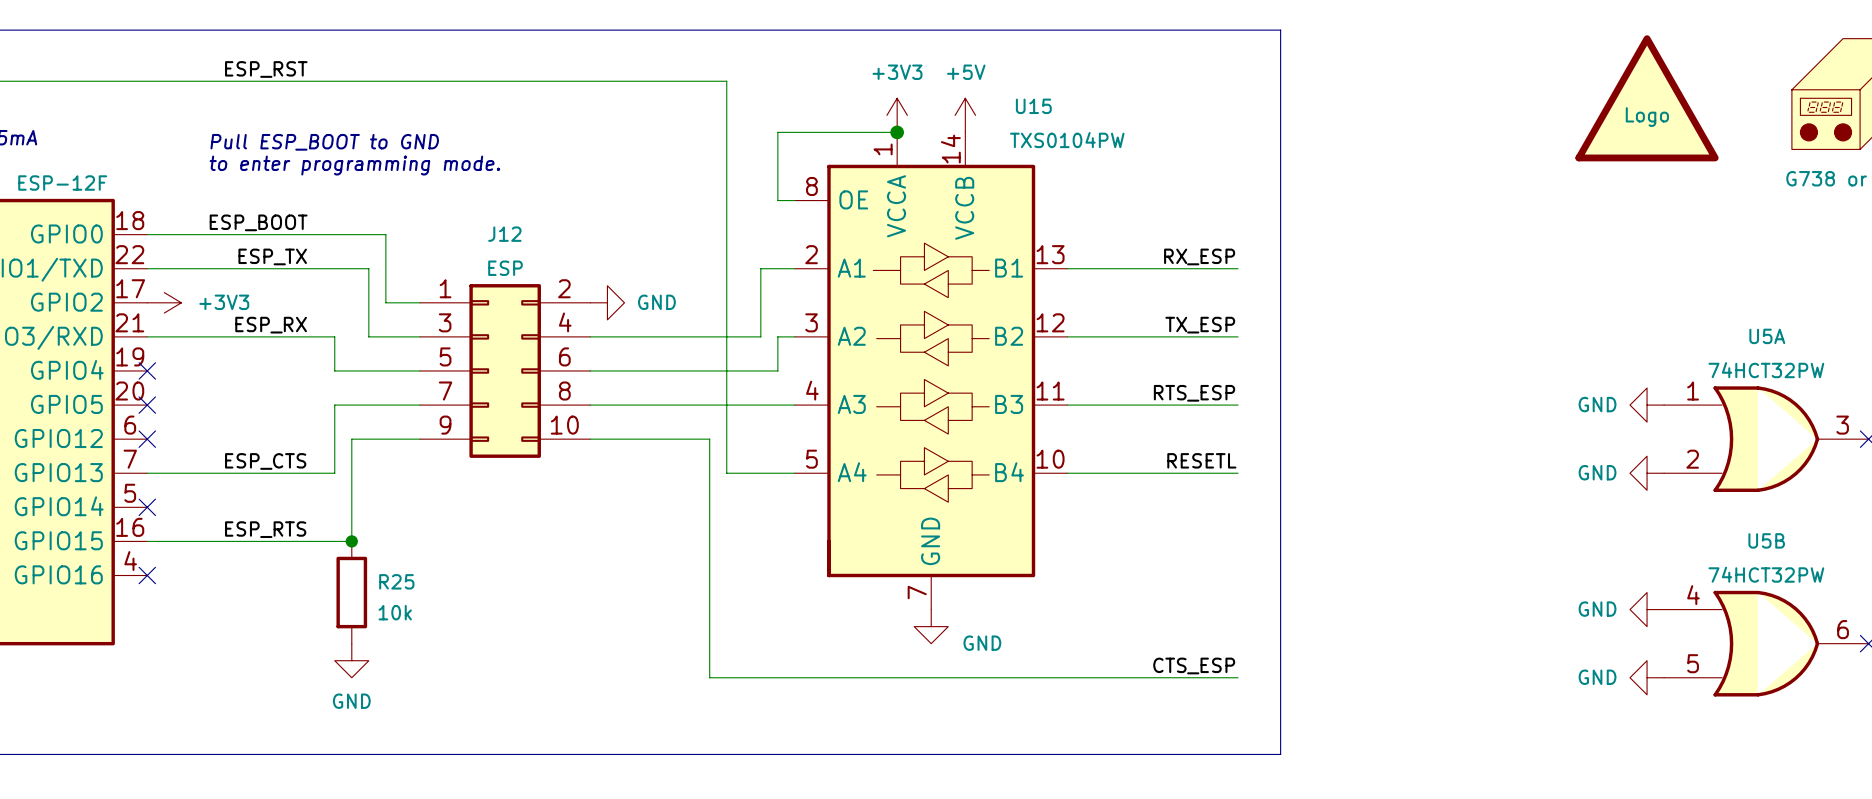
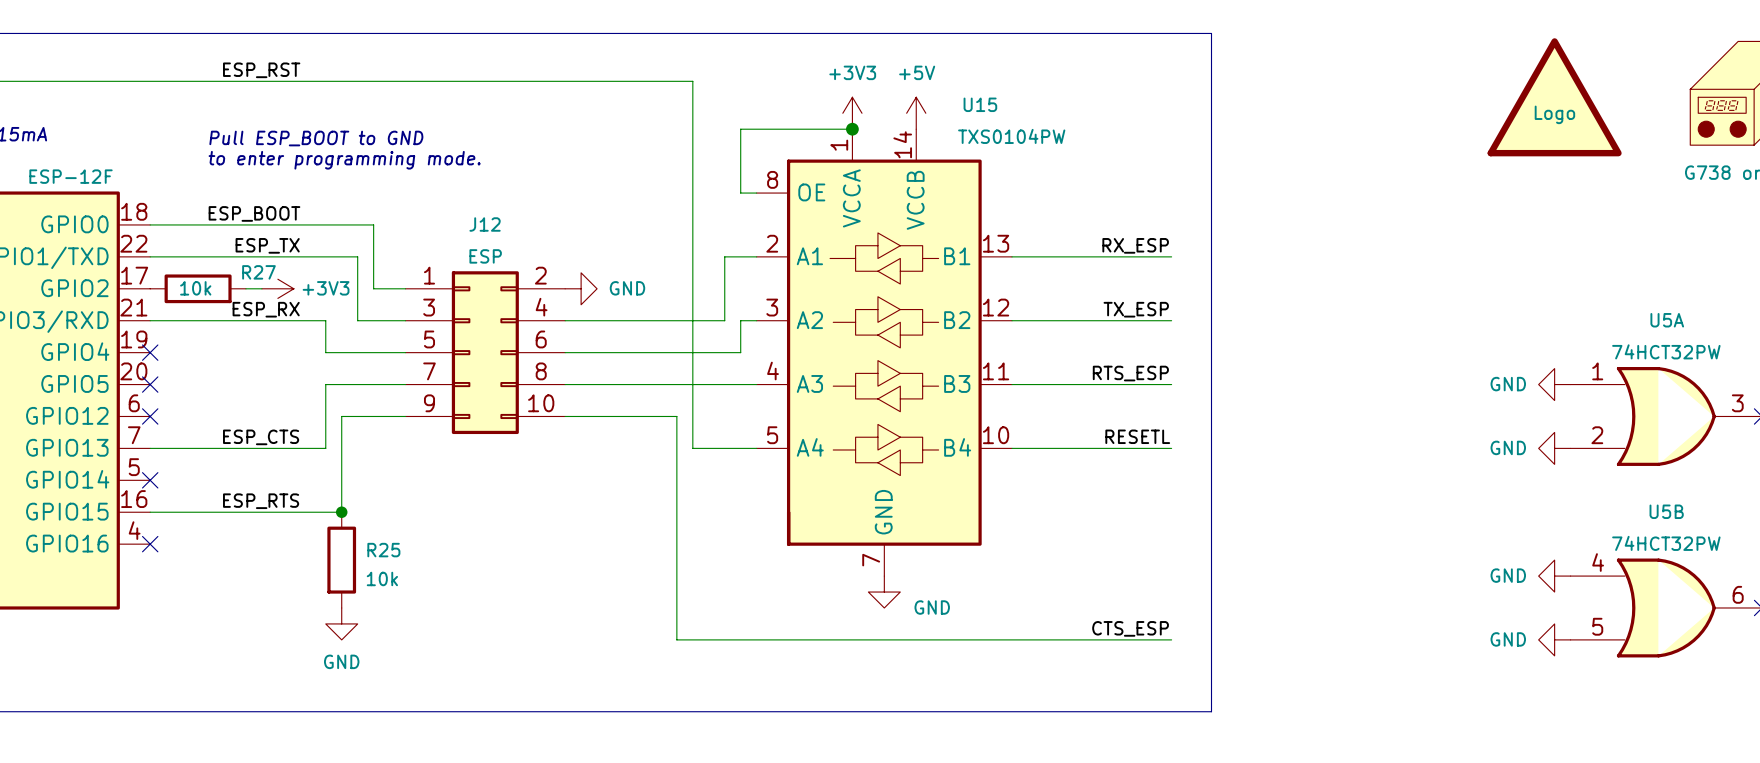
power symbol position: +3V3 (164, 302) -> +3V3 (277, 288)
R27: none -> 10k (198, 288)
power symbol text position: +3V3 (224, 302) -> +3V3 (326, 288)
wire: none -> (245, 288) (261, 288)

